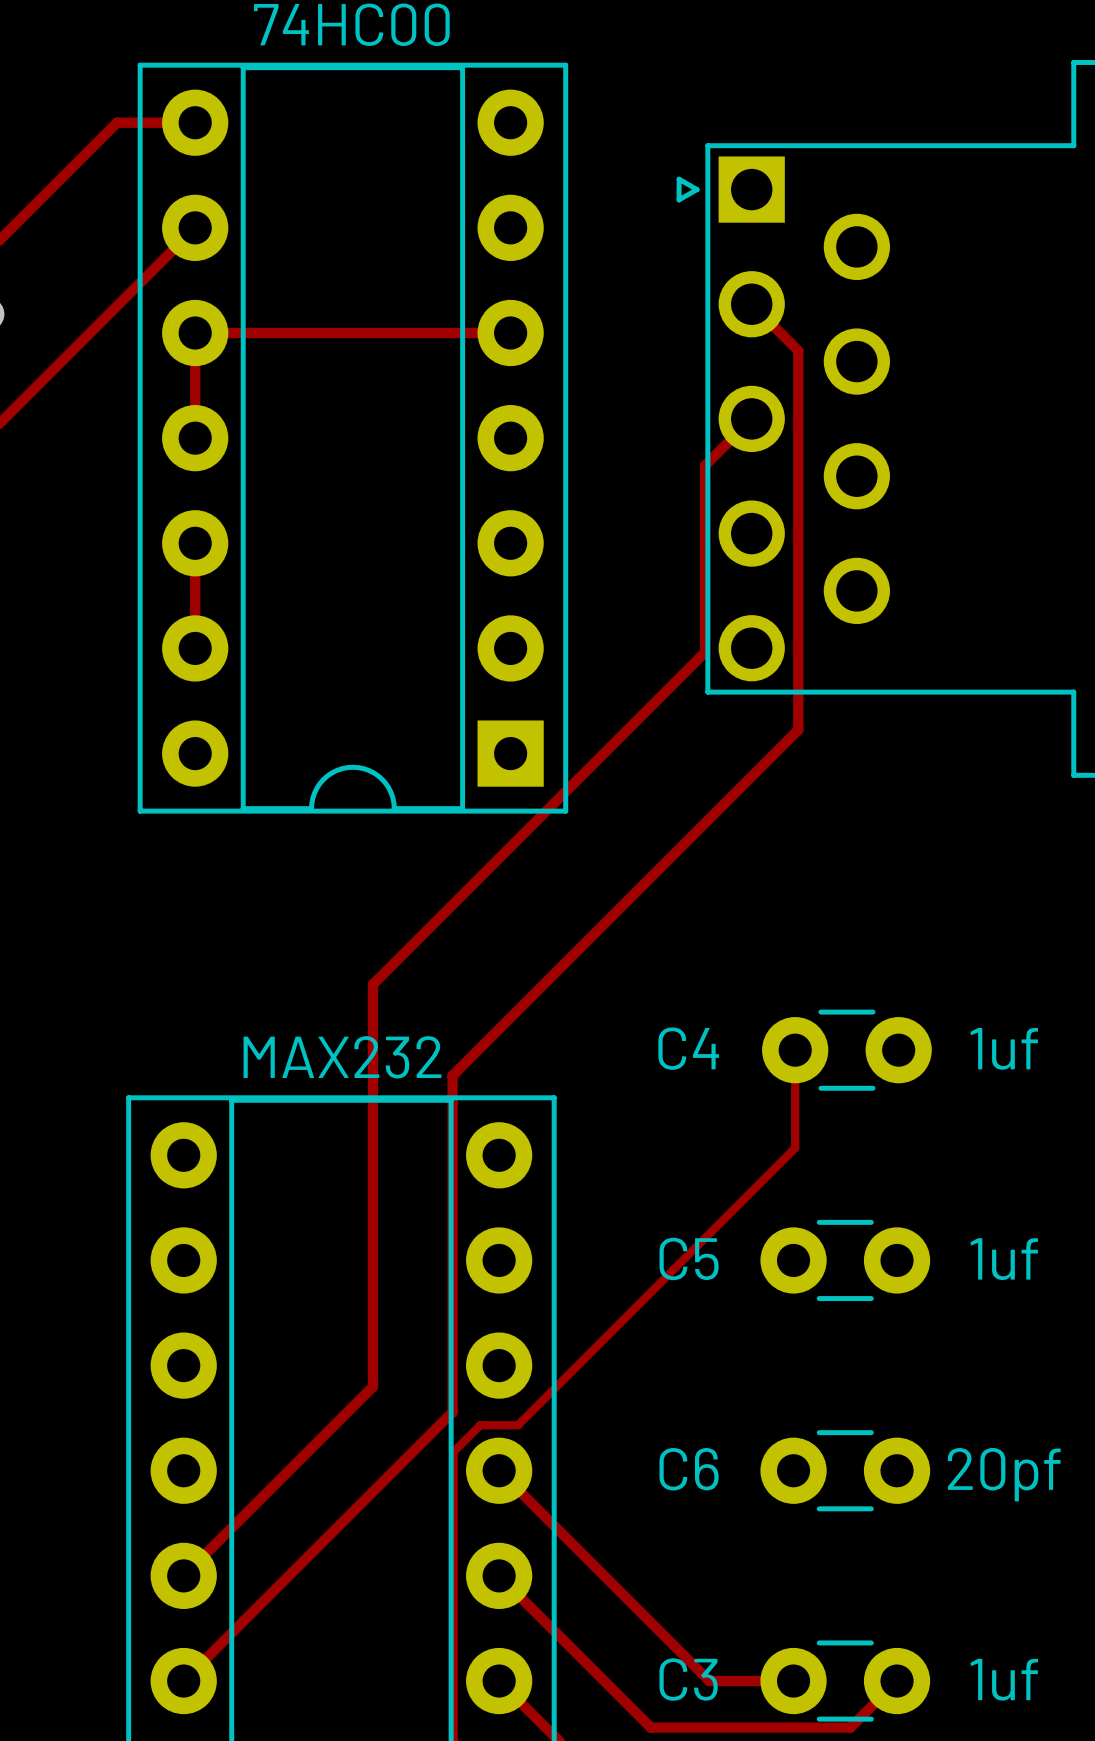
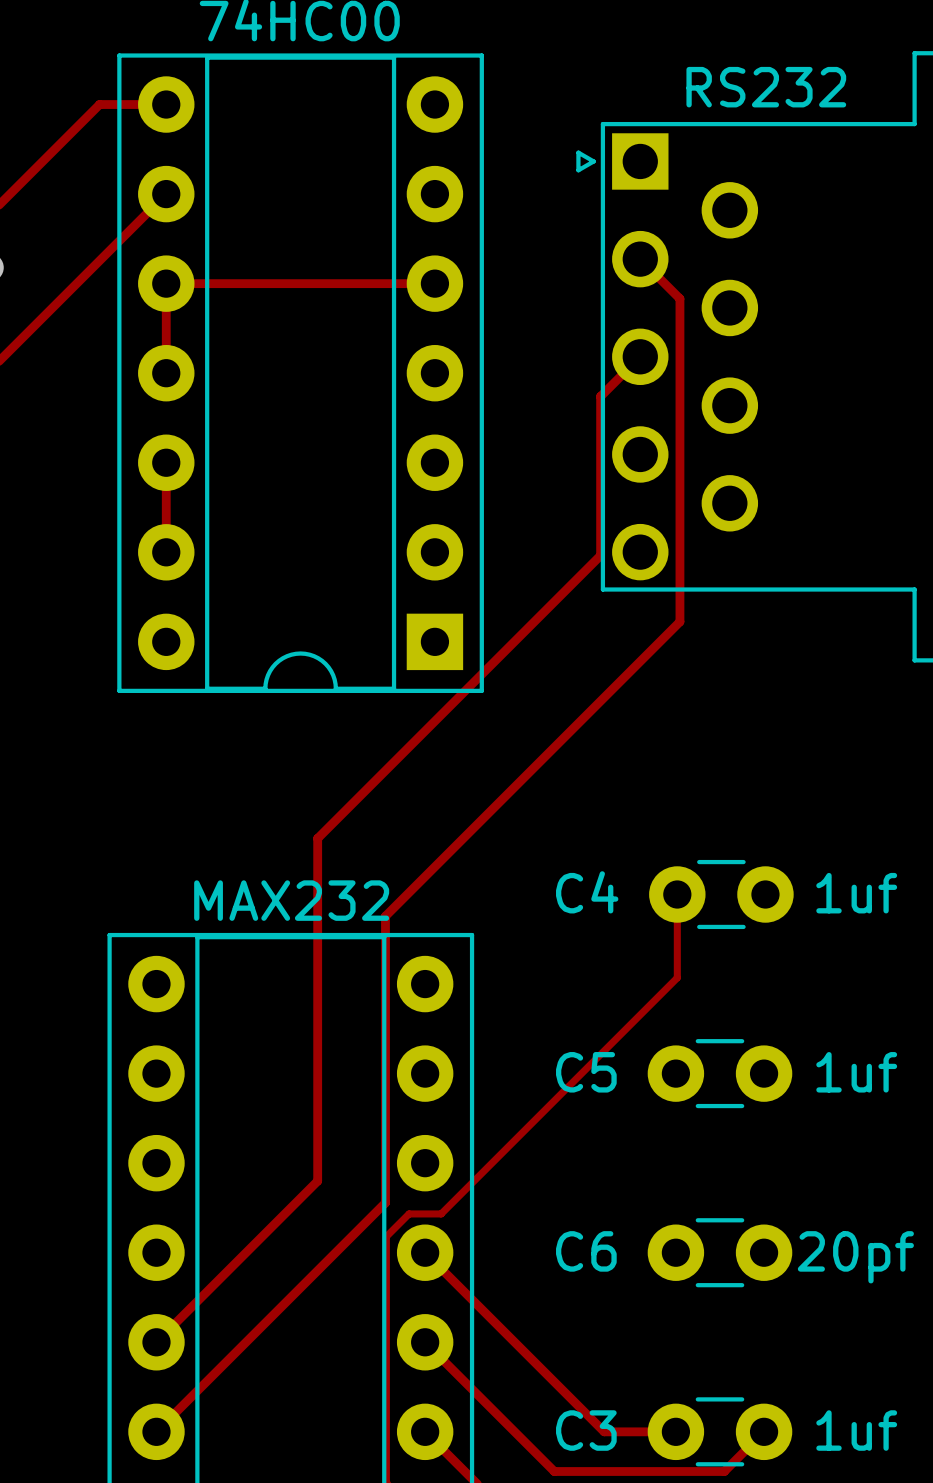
part value: none -> RS232 (766, 87)

